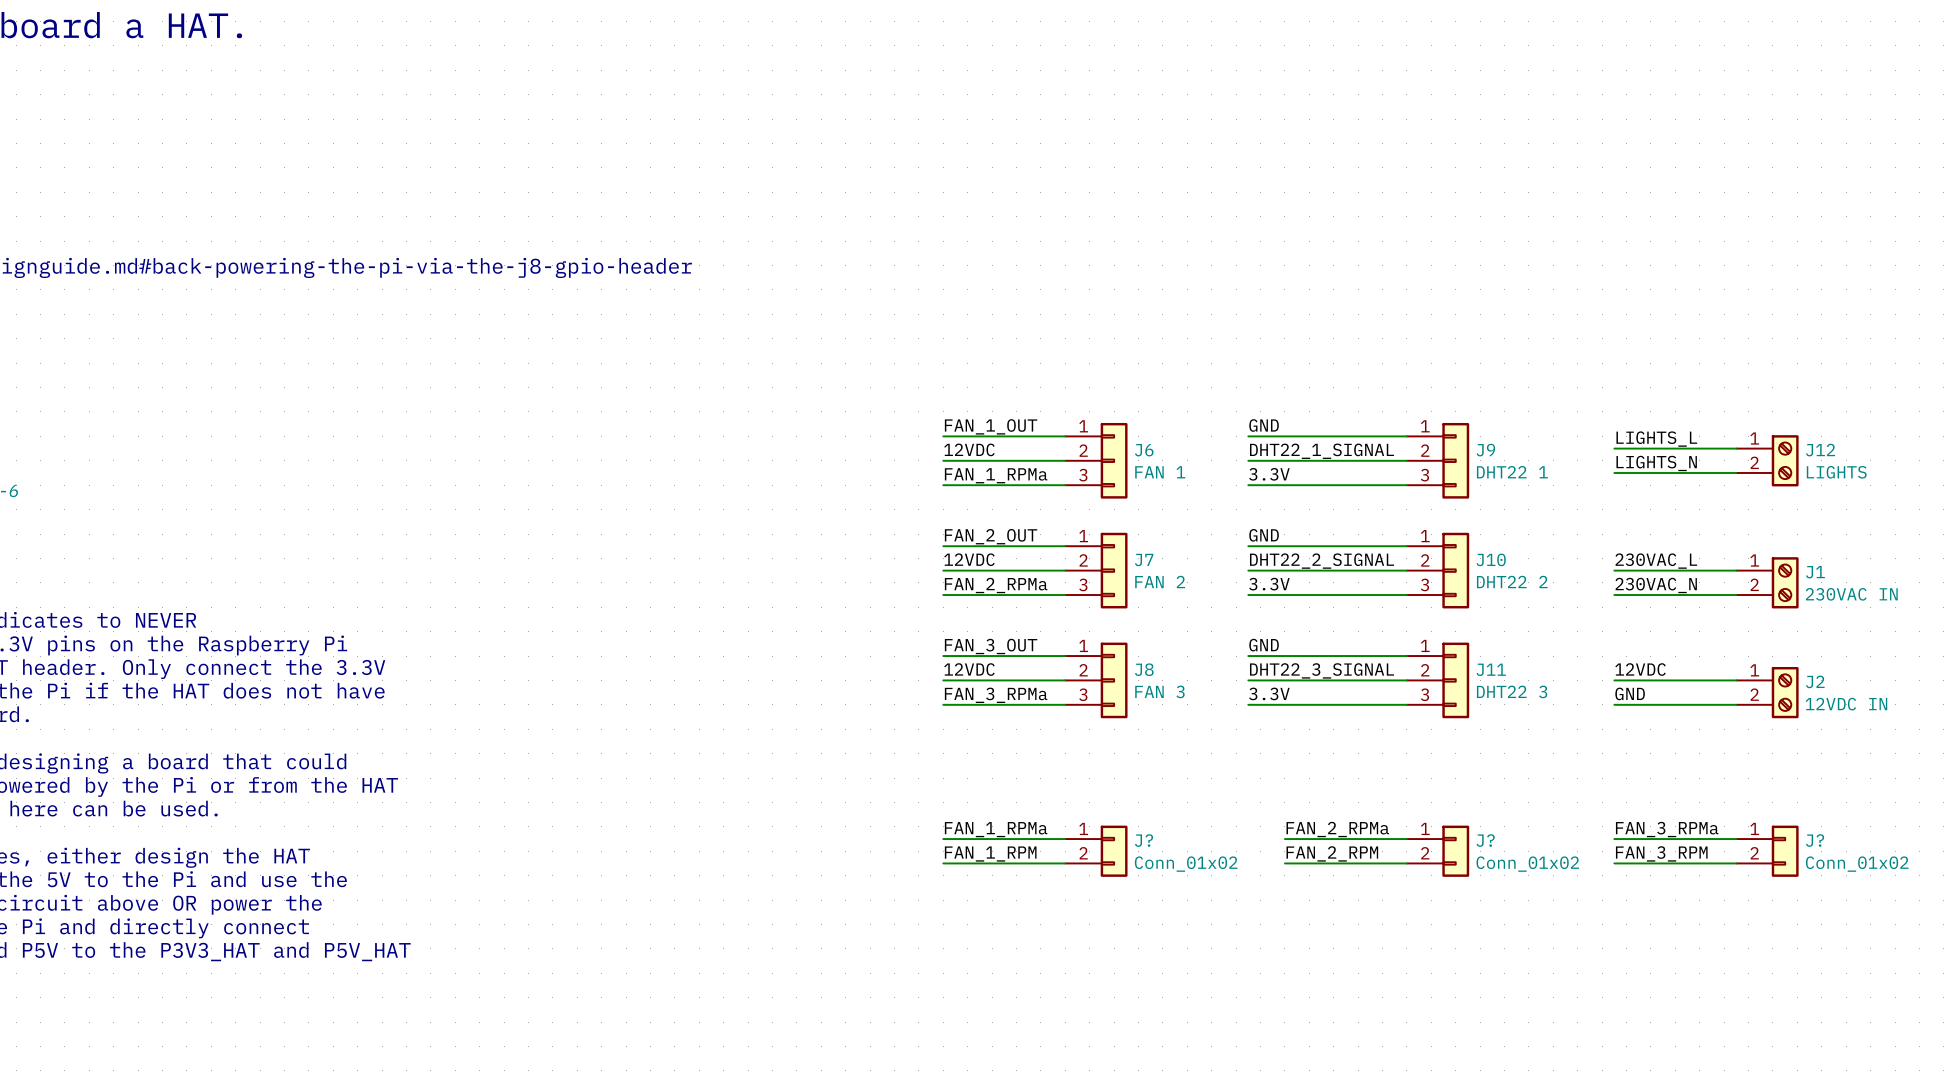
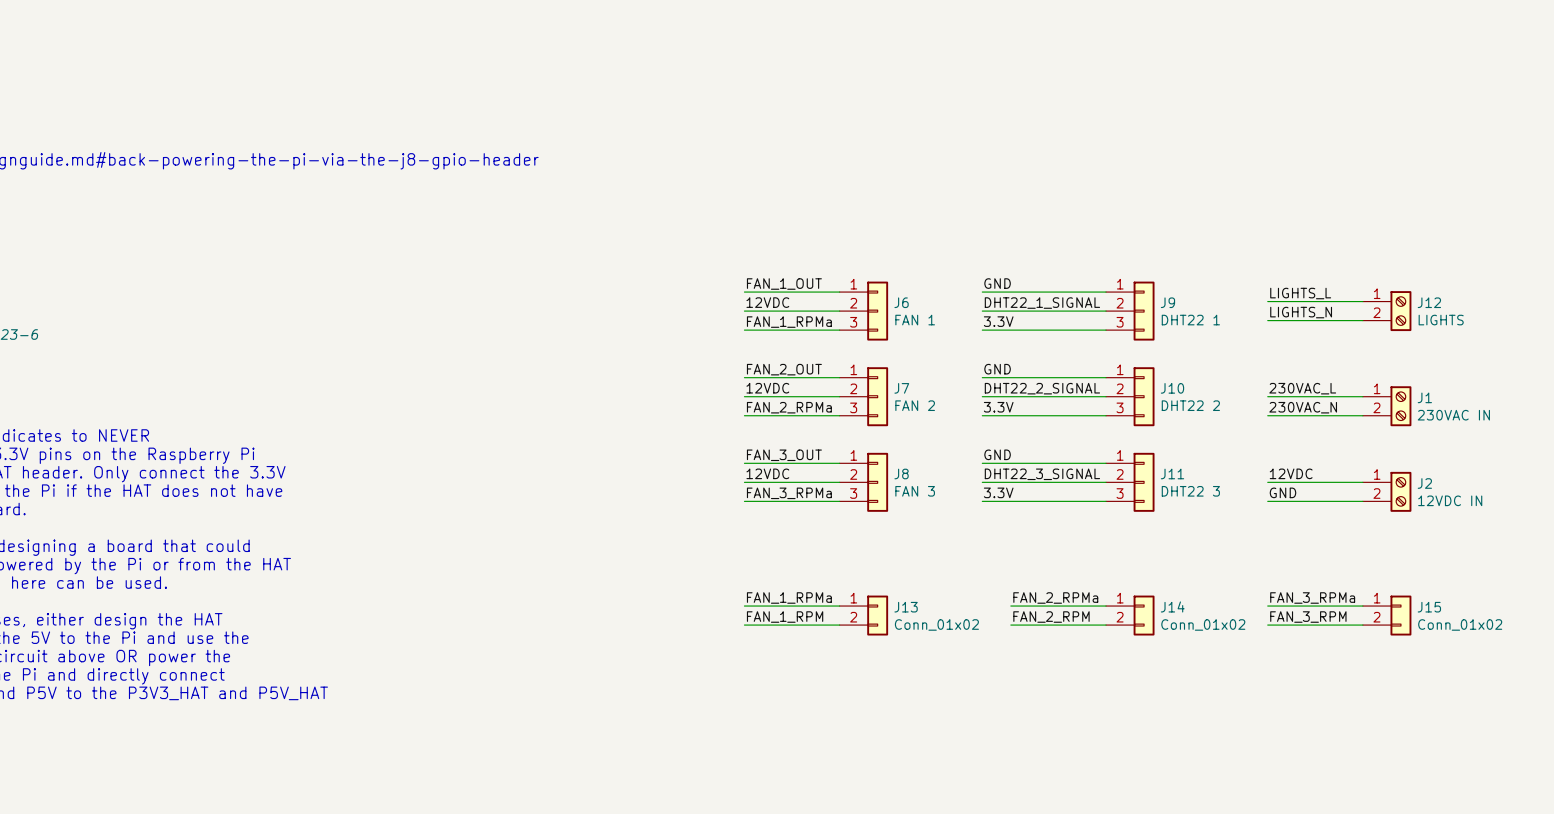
J? name: J? (1143, 840) -> J13 (906, 607)
J? name: J? (1485, 840) -> J14 (1172, 606)
J? name: J? (1815, 840) -> J15 (1429, 607)

